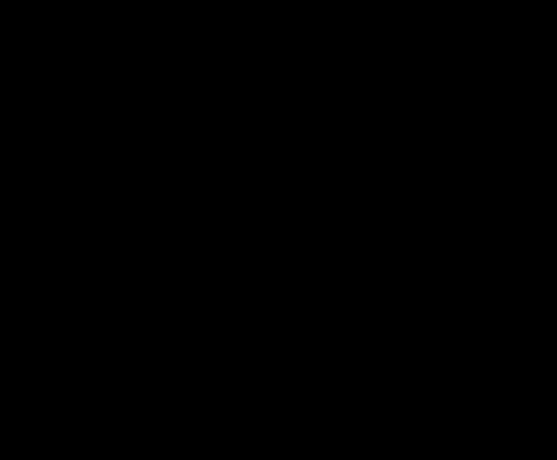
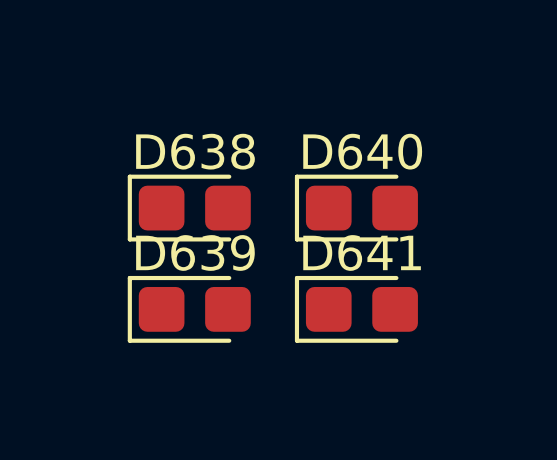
D638: none -> (189, 208)
D640: none -> (356, 208)
D639: none -> (189, 309)
D641: none -> (356, 309)

